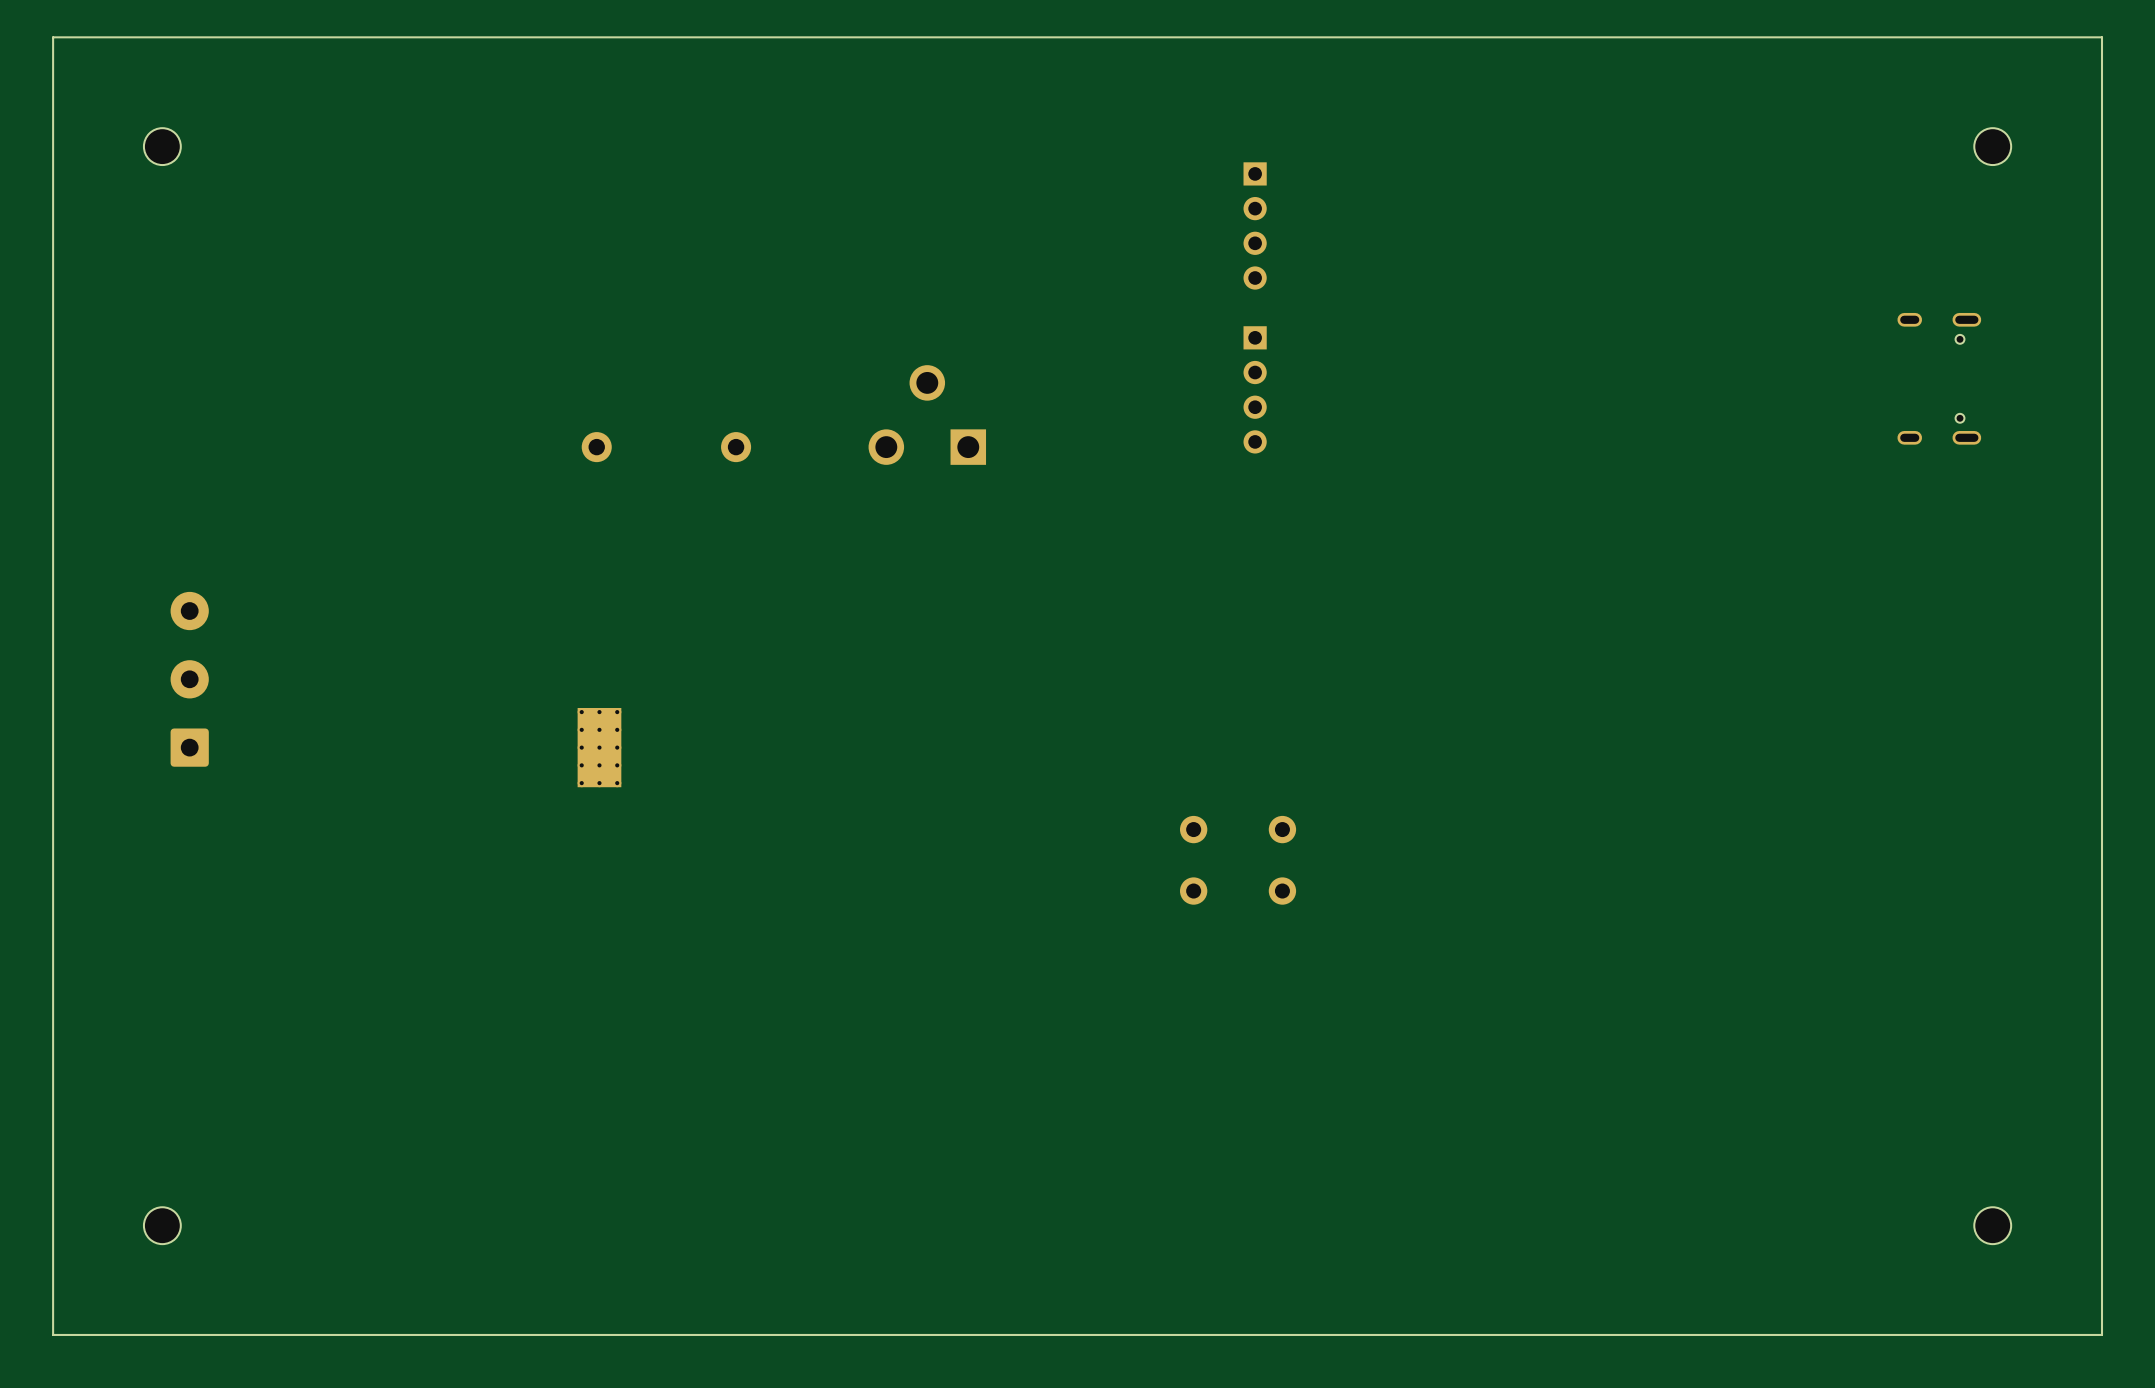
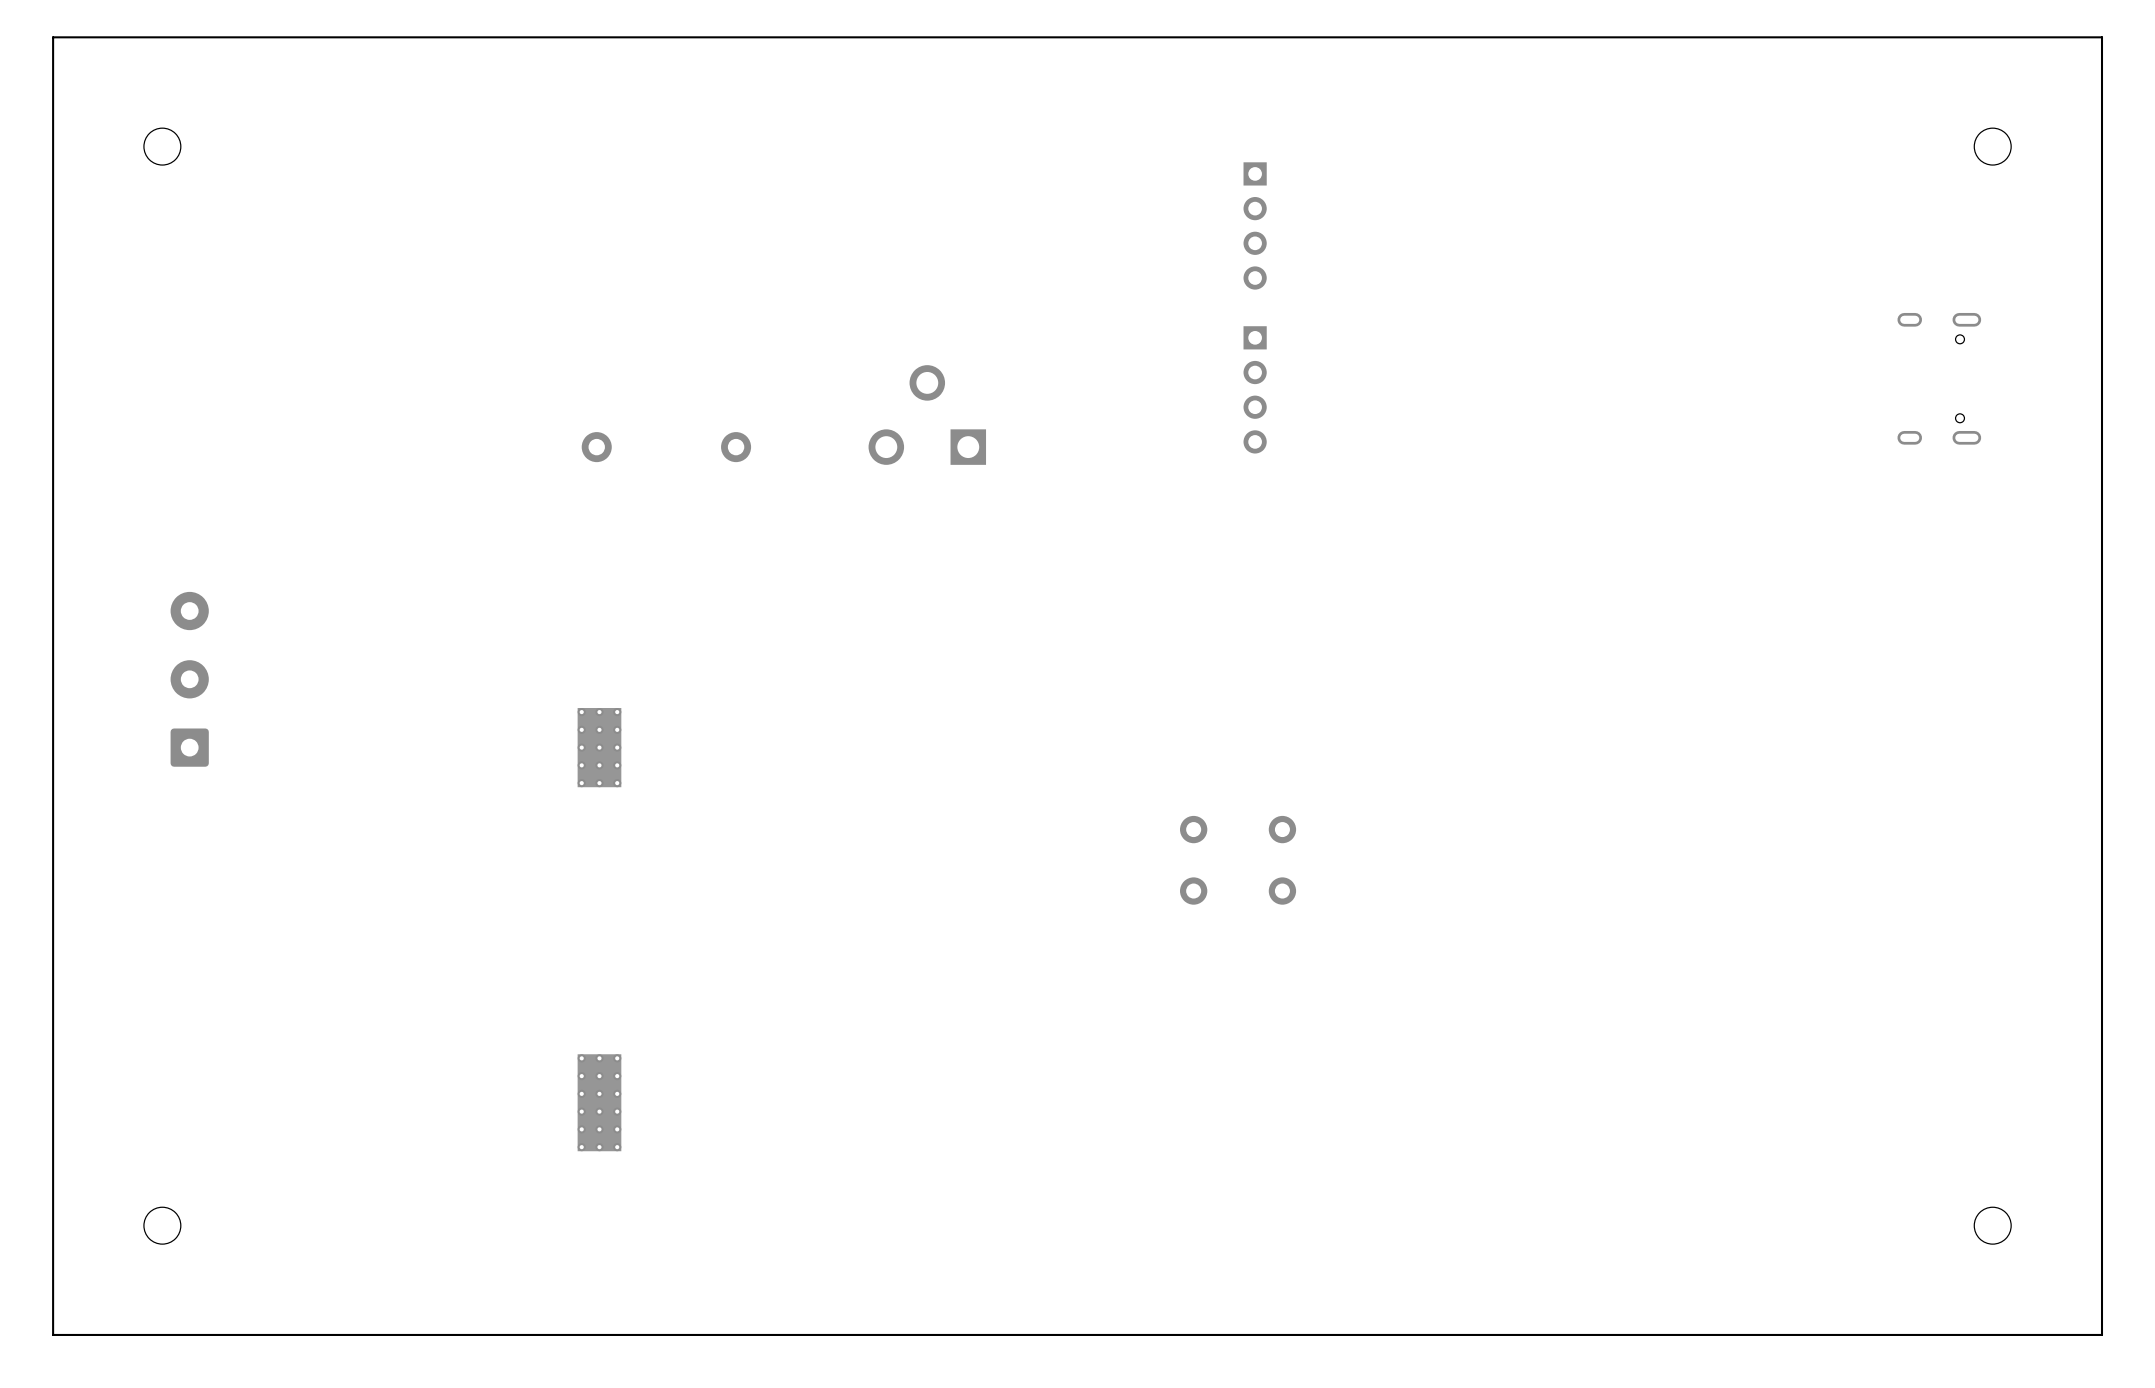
part: none -> (599, 1102)

